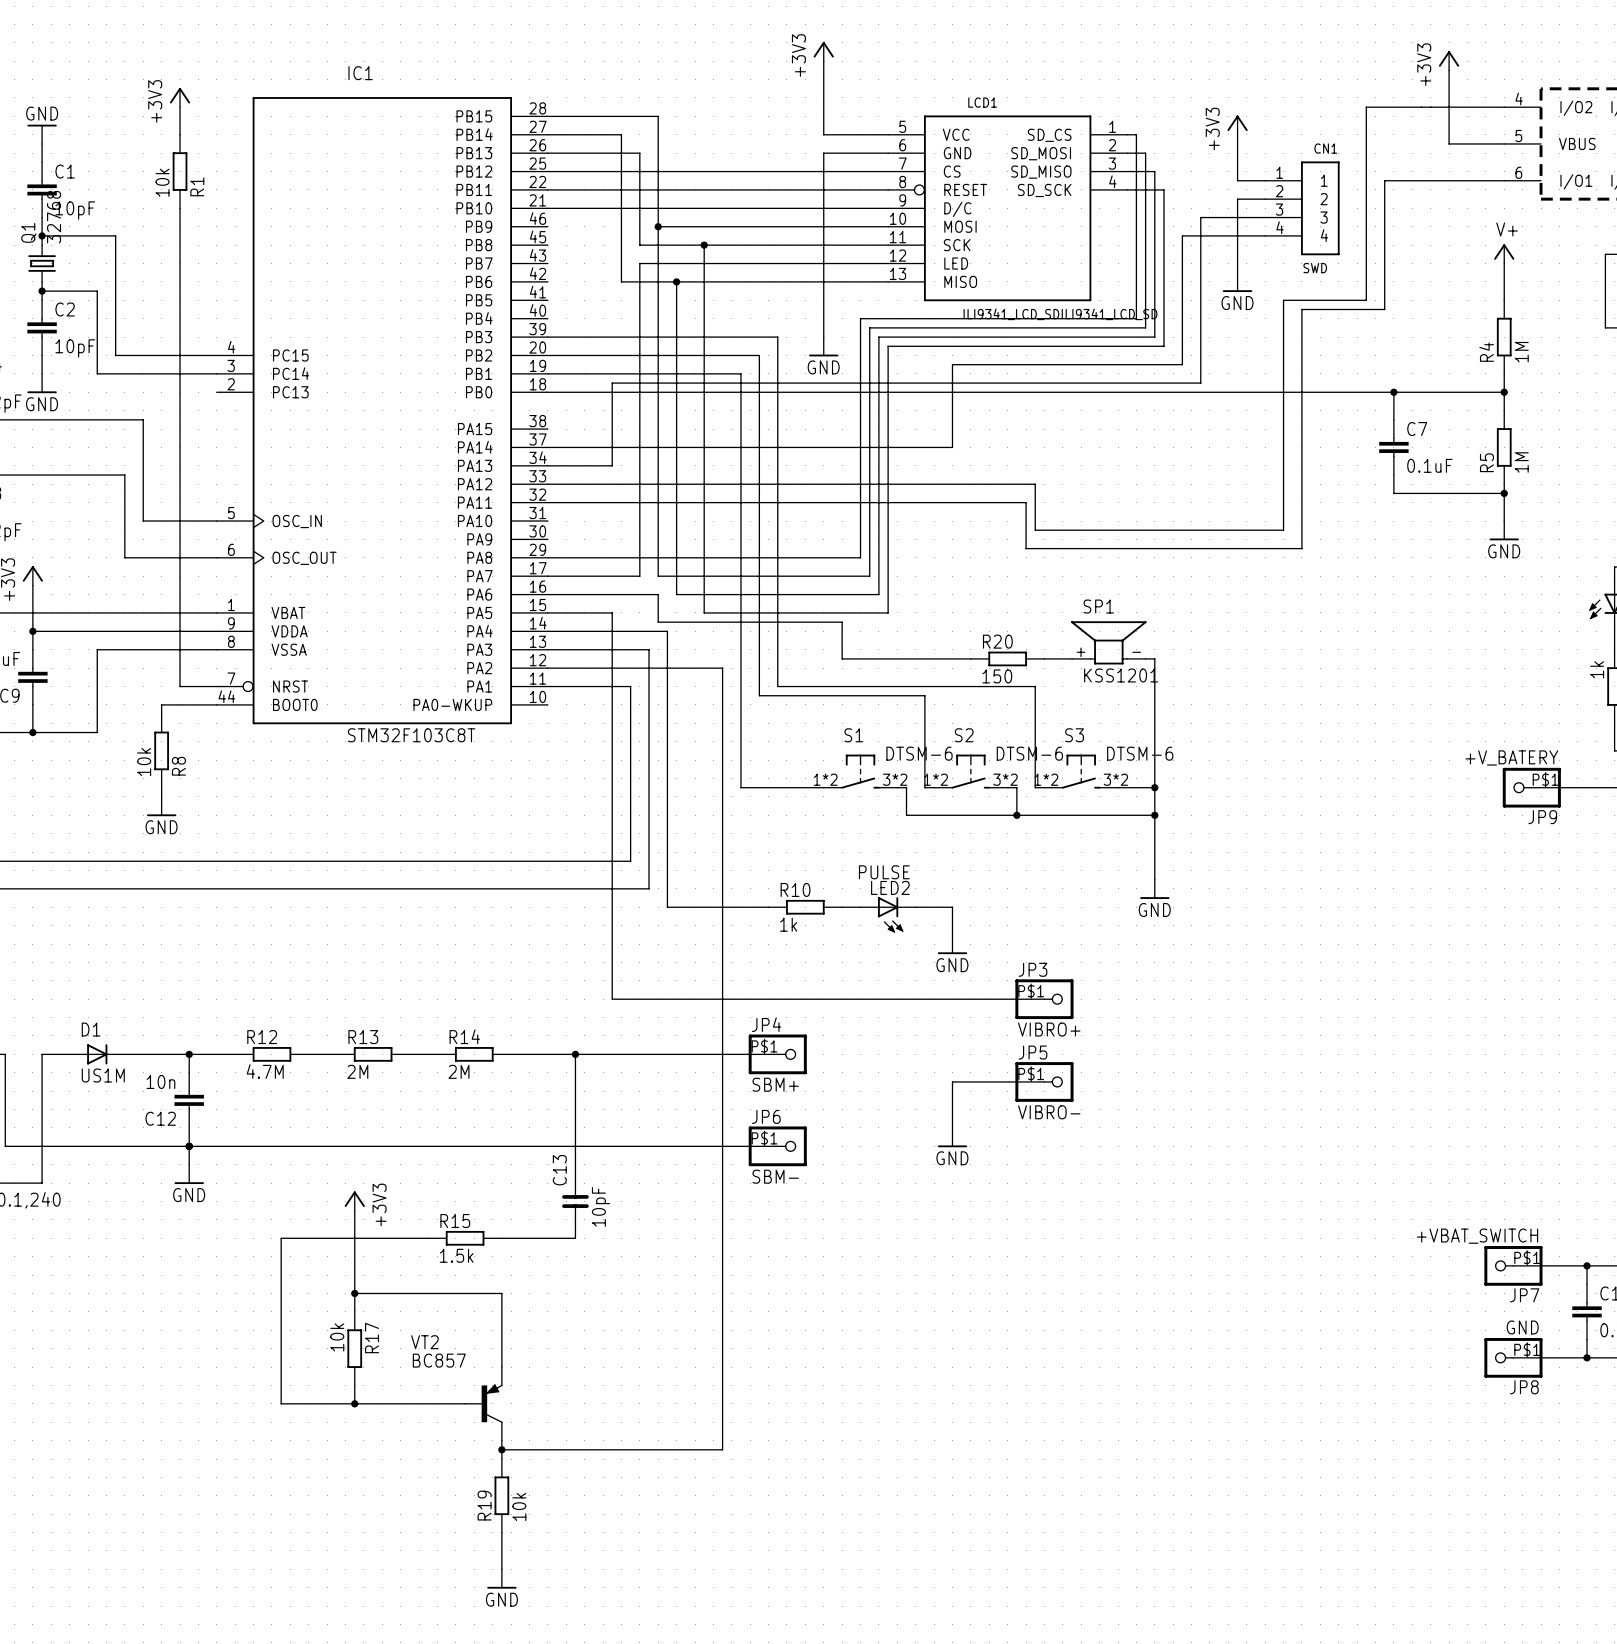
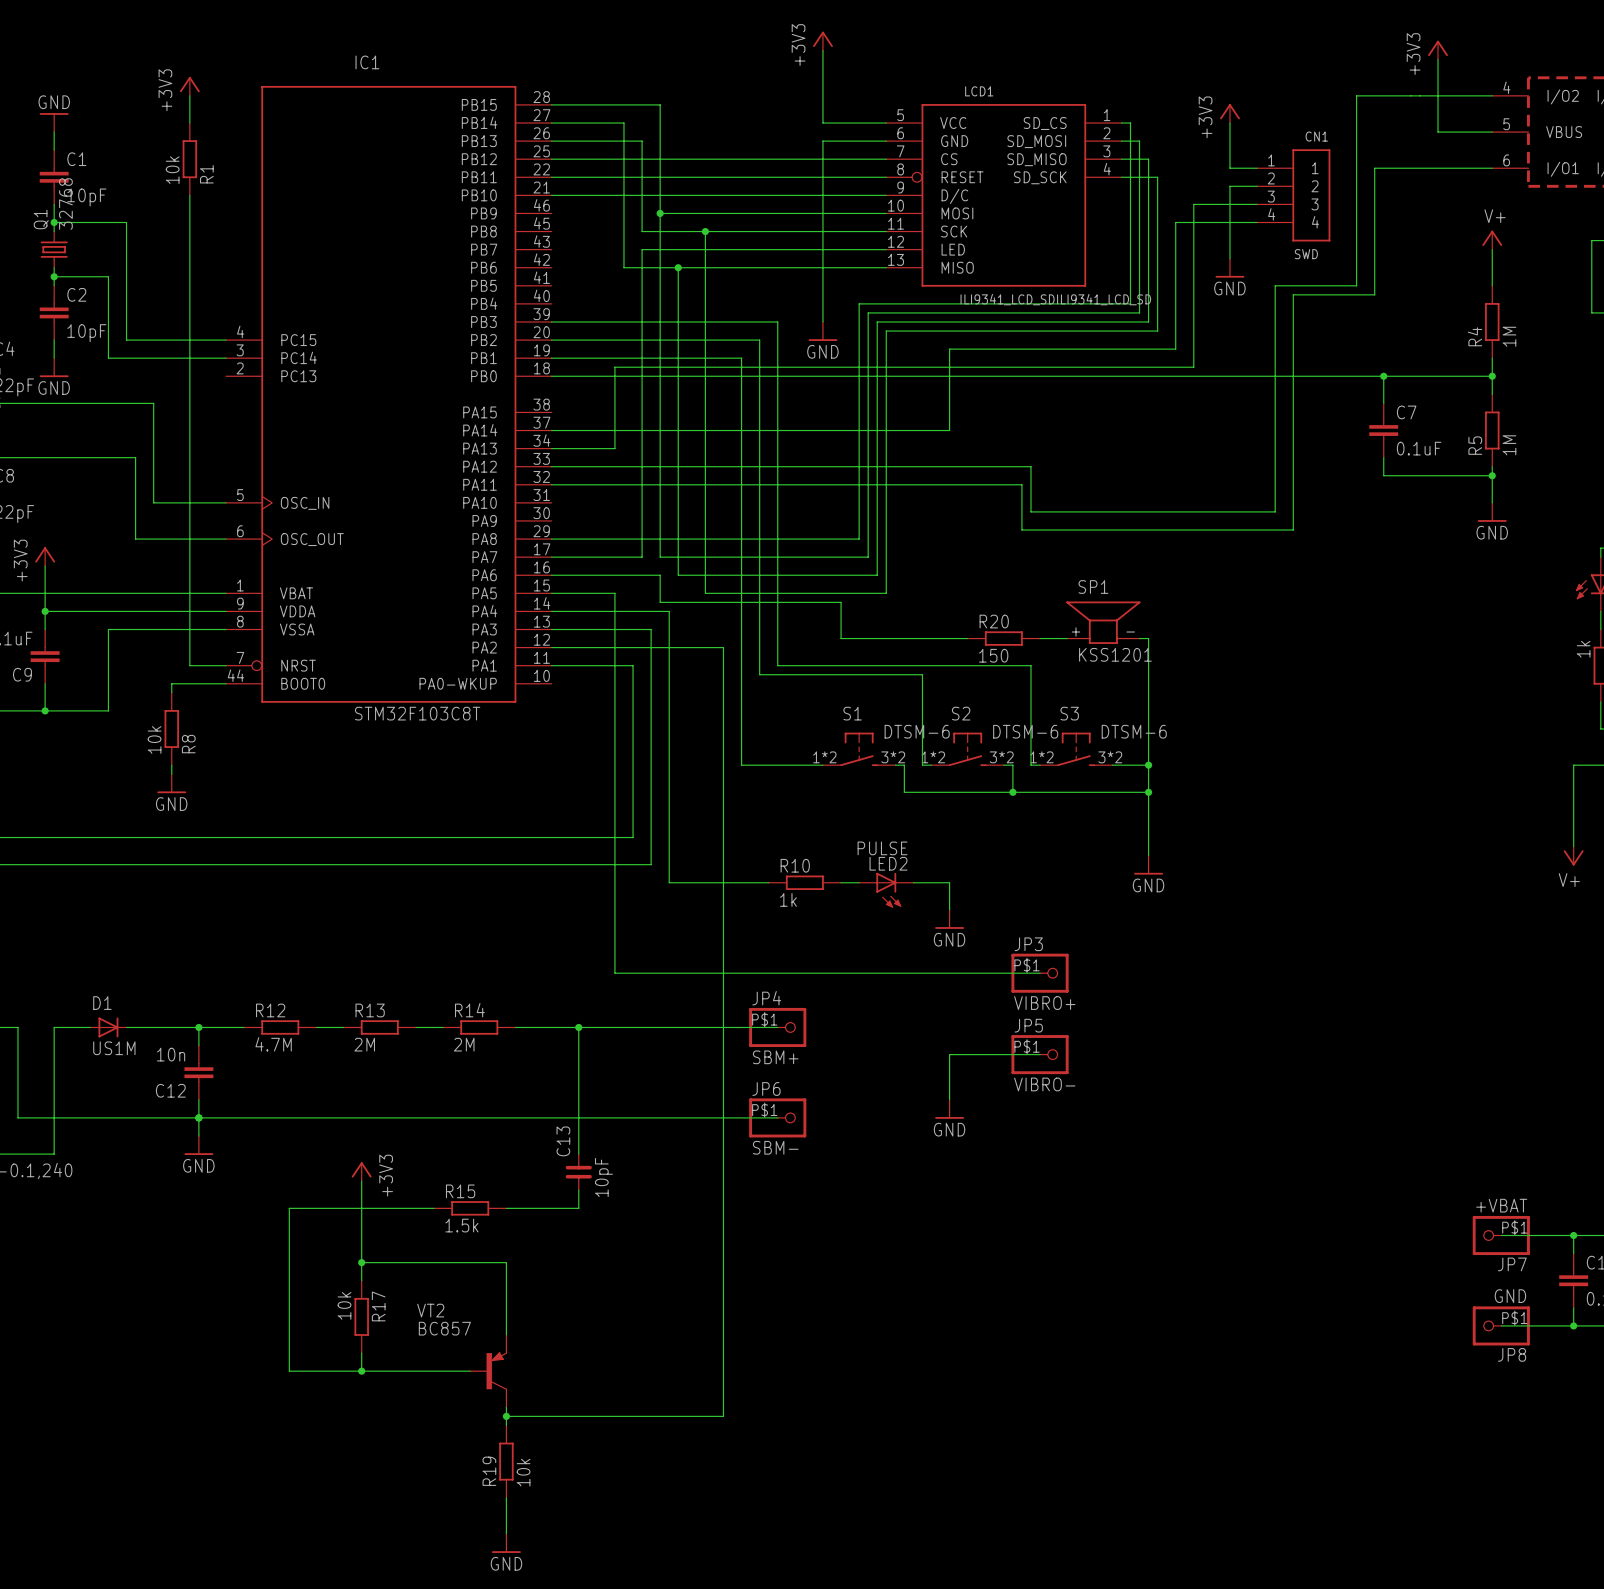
wire: (1531, 787) (1587, 787) -> (1573, 846) (1573, 765)
JP9: +V_BATERY (1531, 787) -> none
power symbol: none -> V+ (1573, 856)
JP7 value: +VBAT_SWITCH (1477, 1236) -> +VBAT (1501, 1205)

